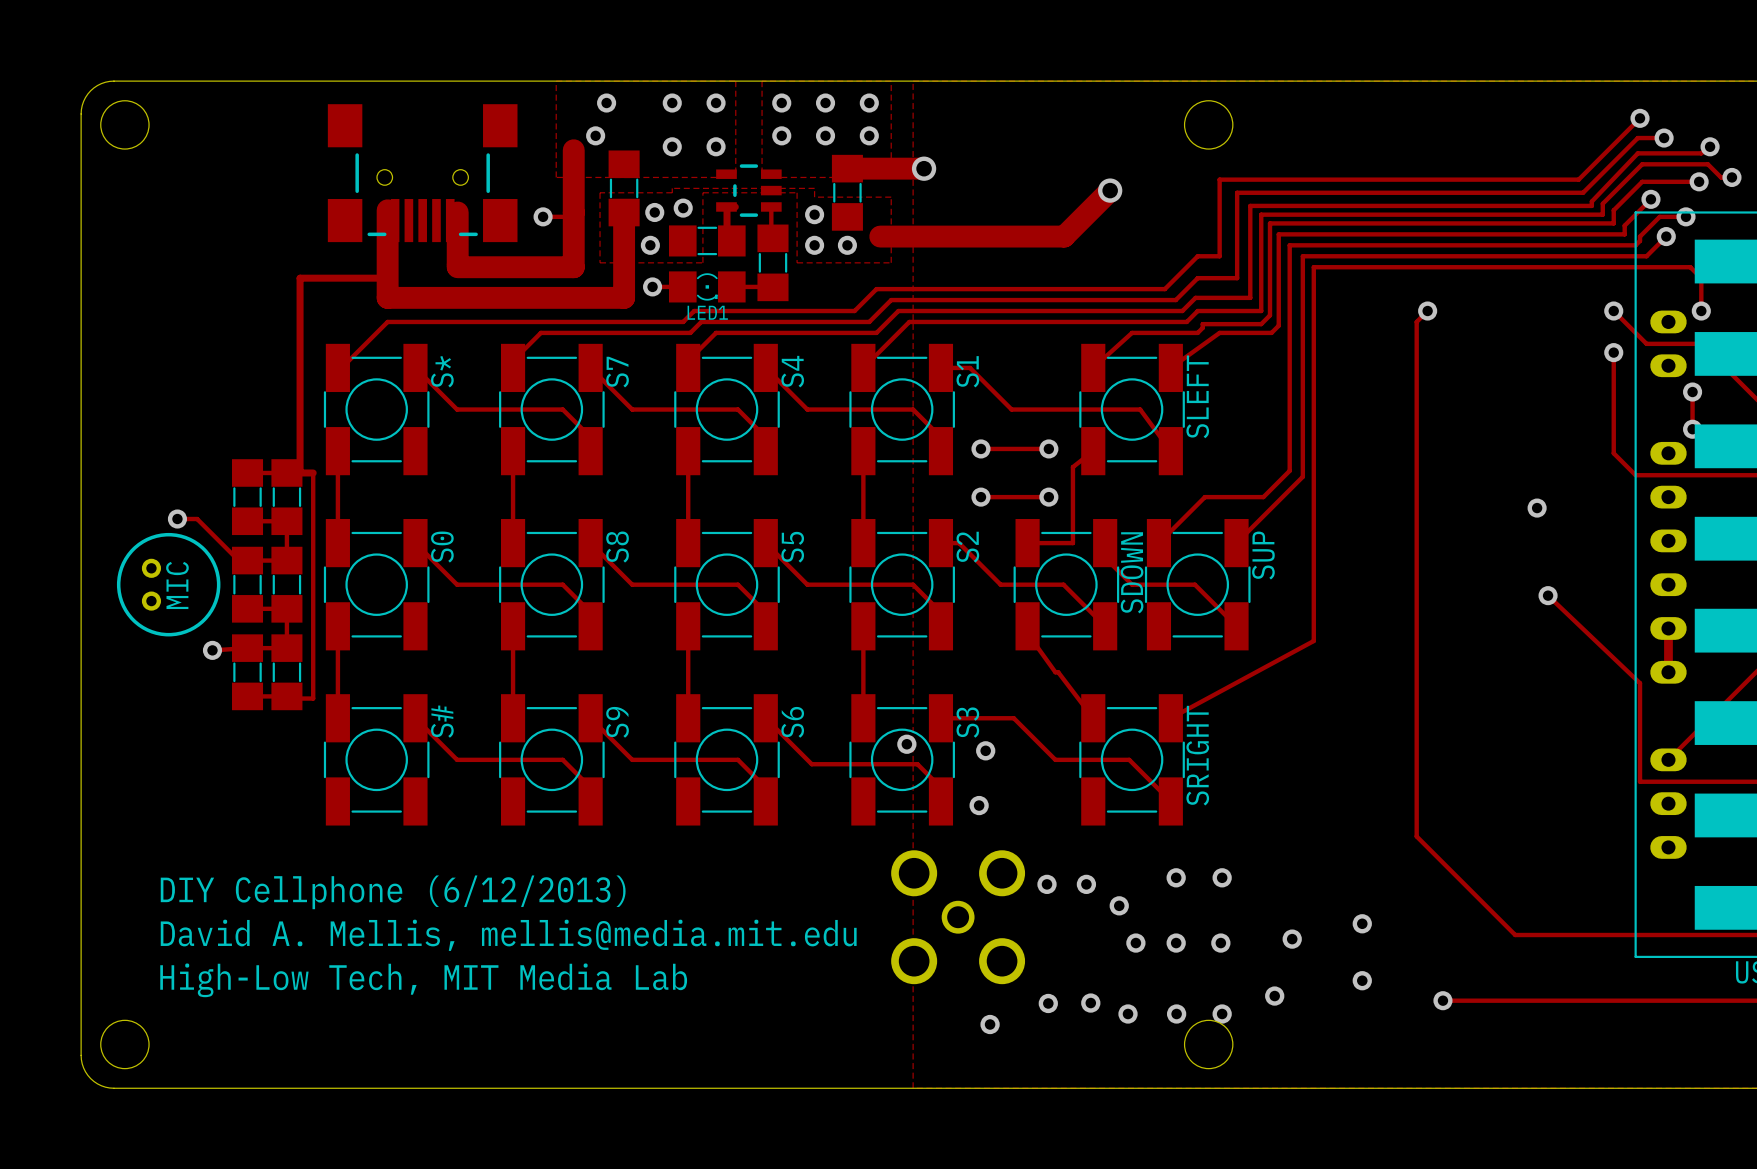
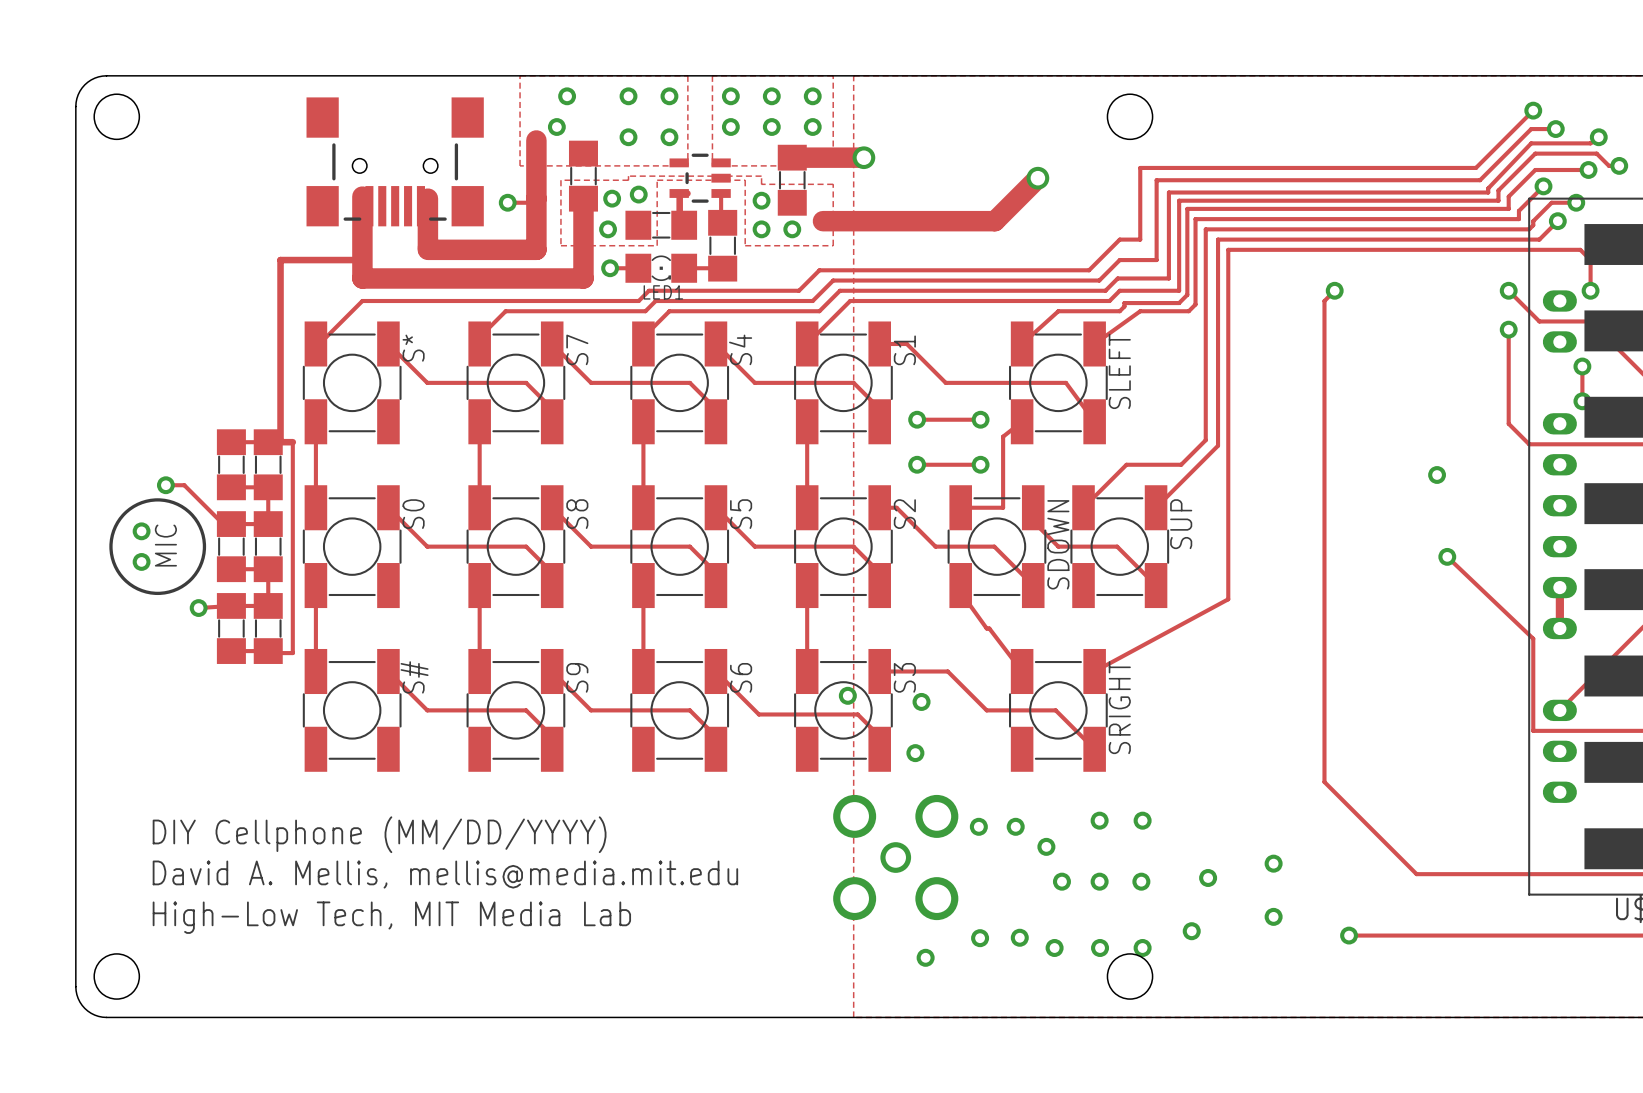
text: DIY Cellphone (6/12/2013) (393, 892) -> DIY Cellphone (MM/DD/YYYY) (379, 834)

